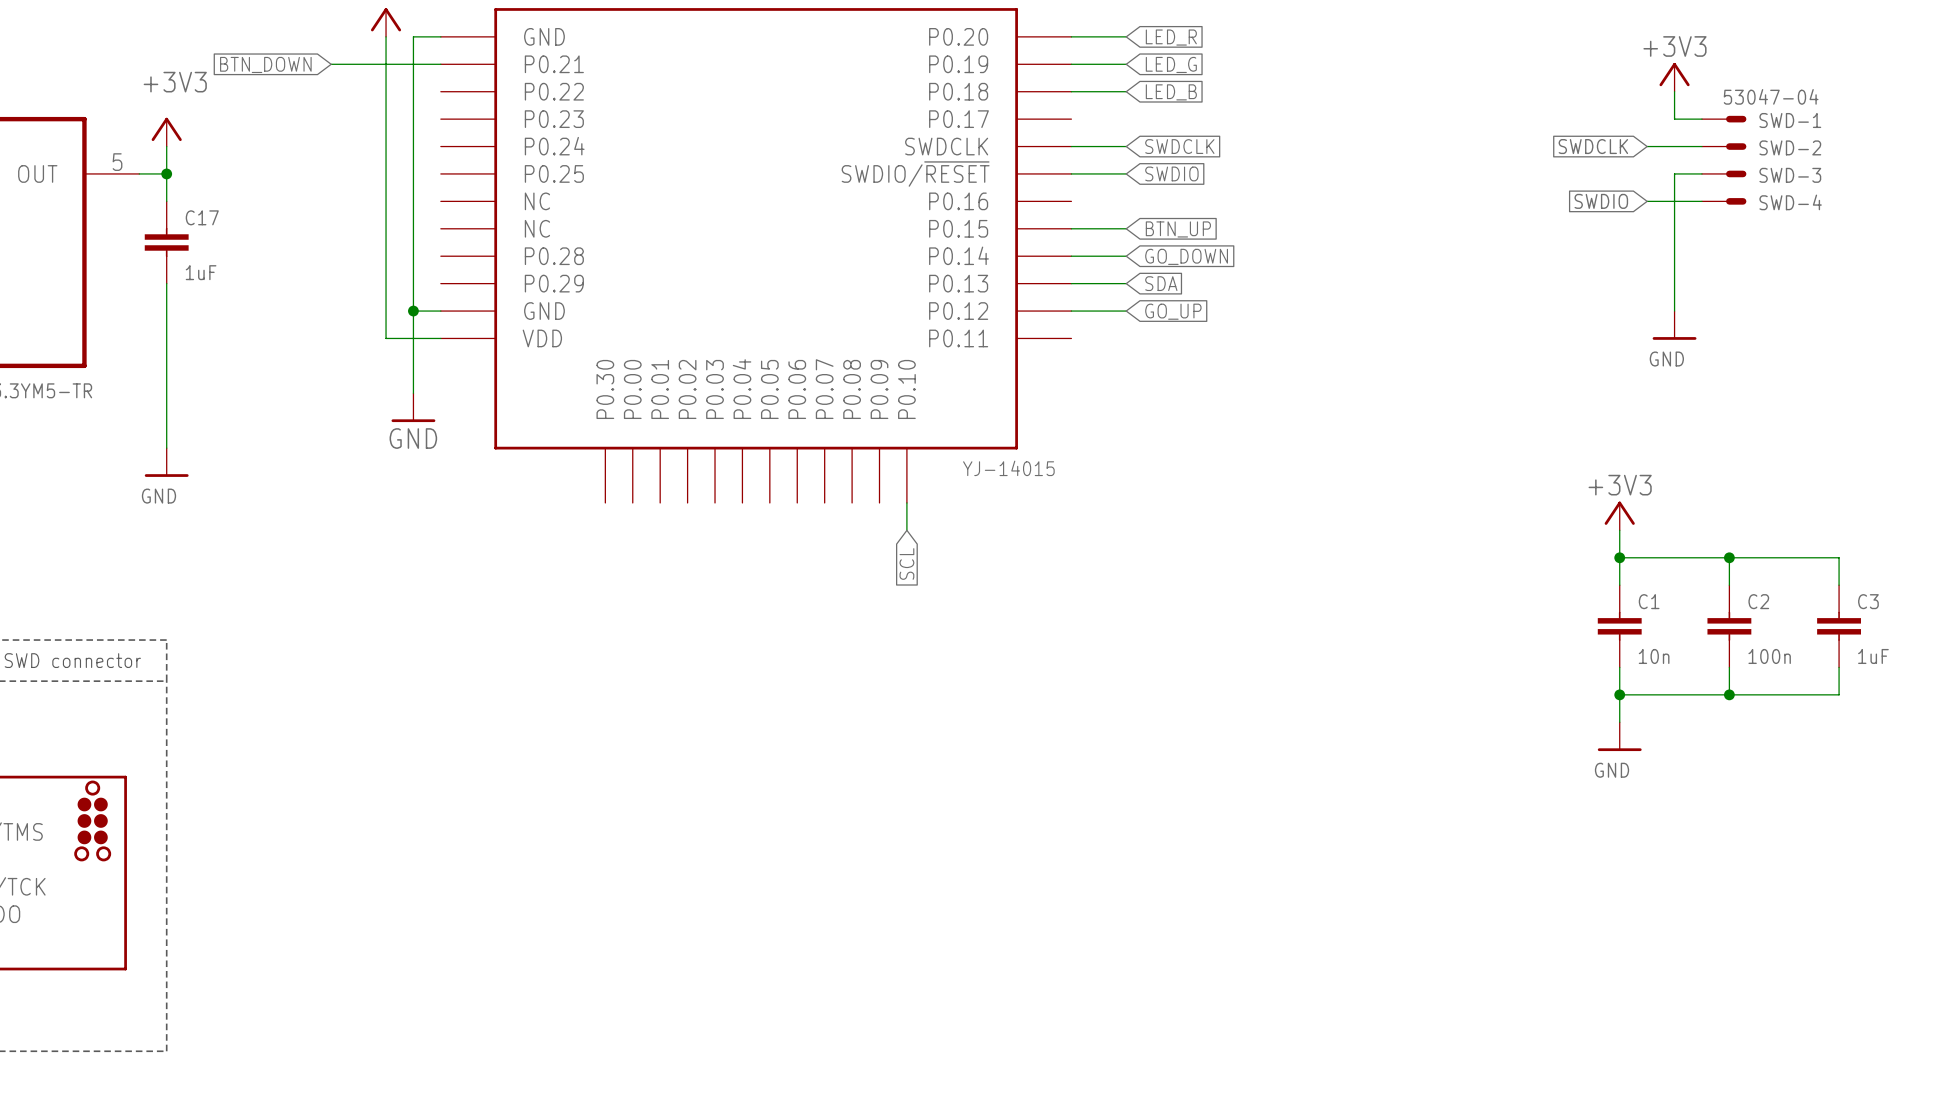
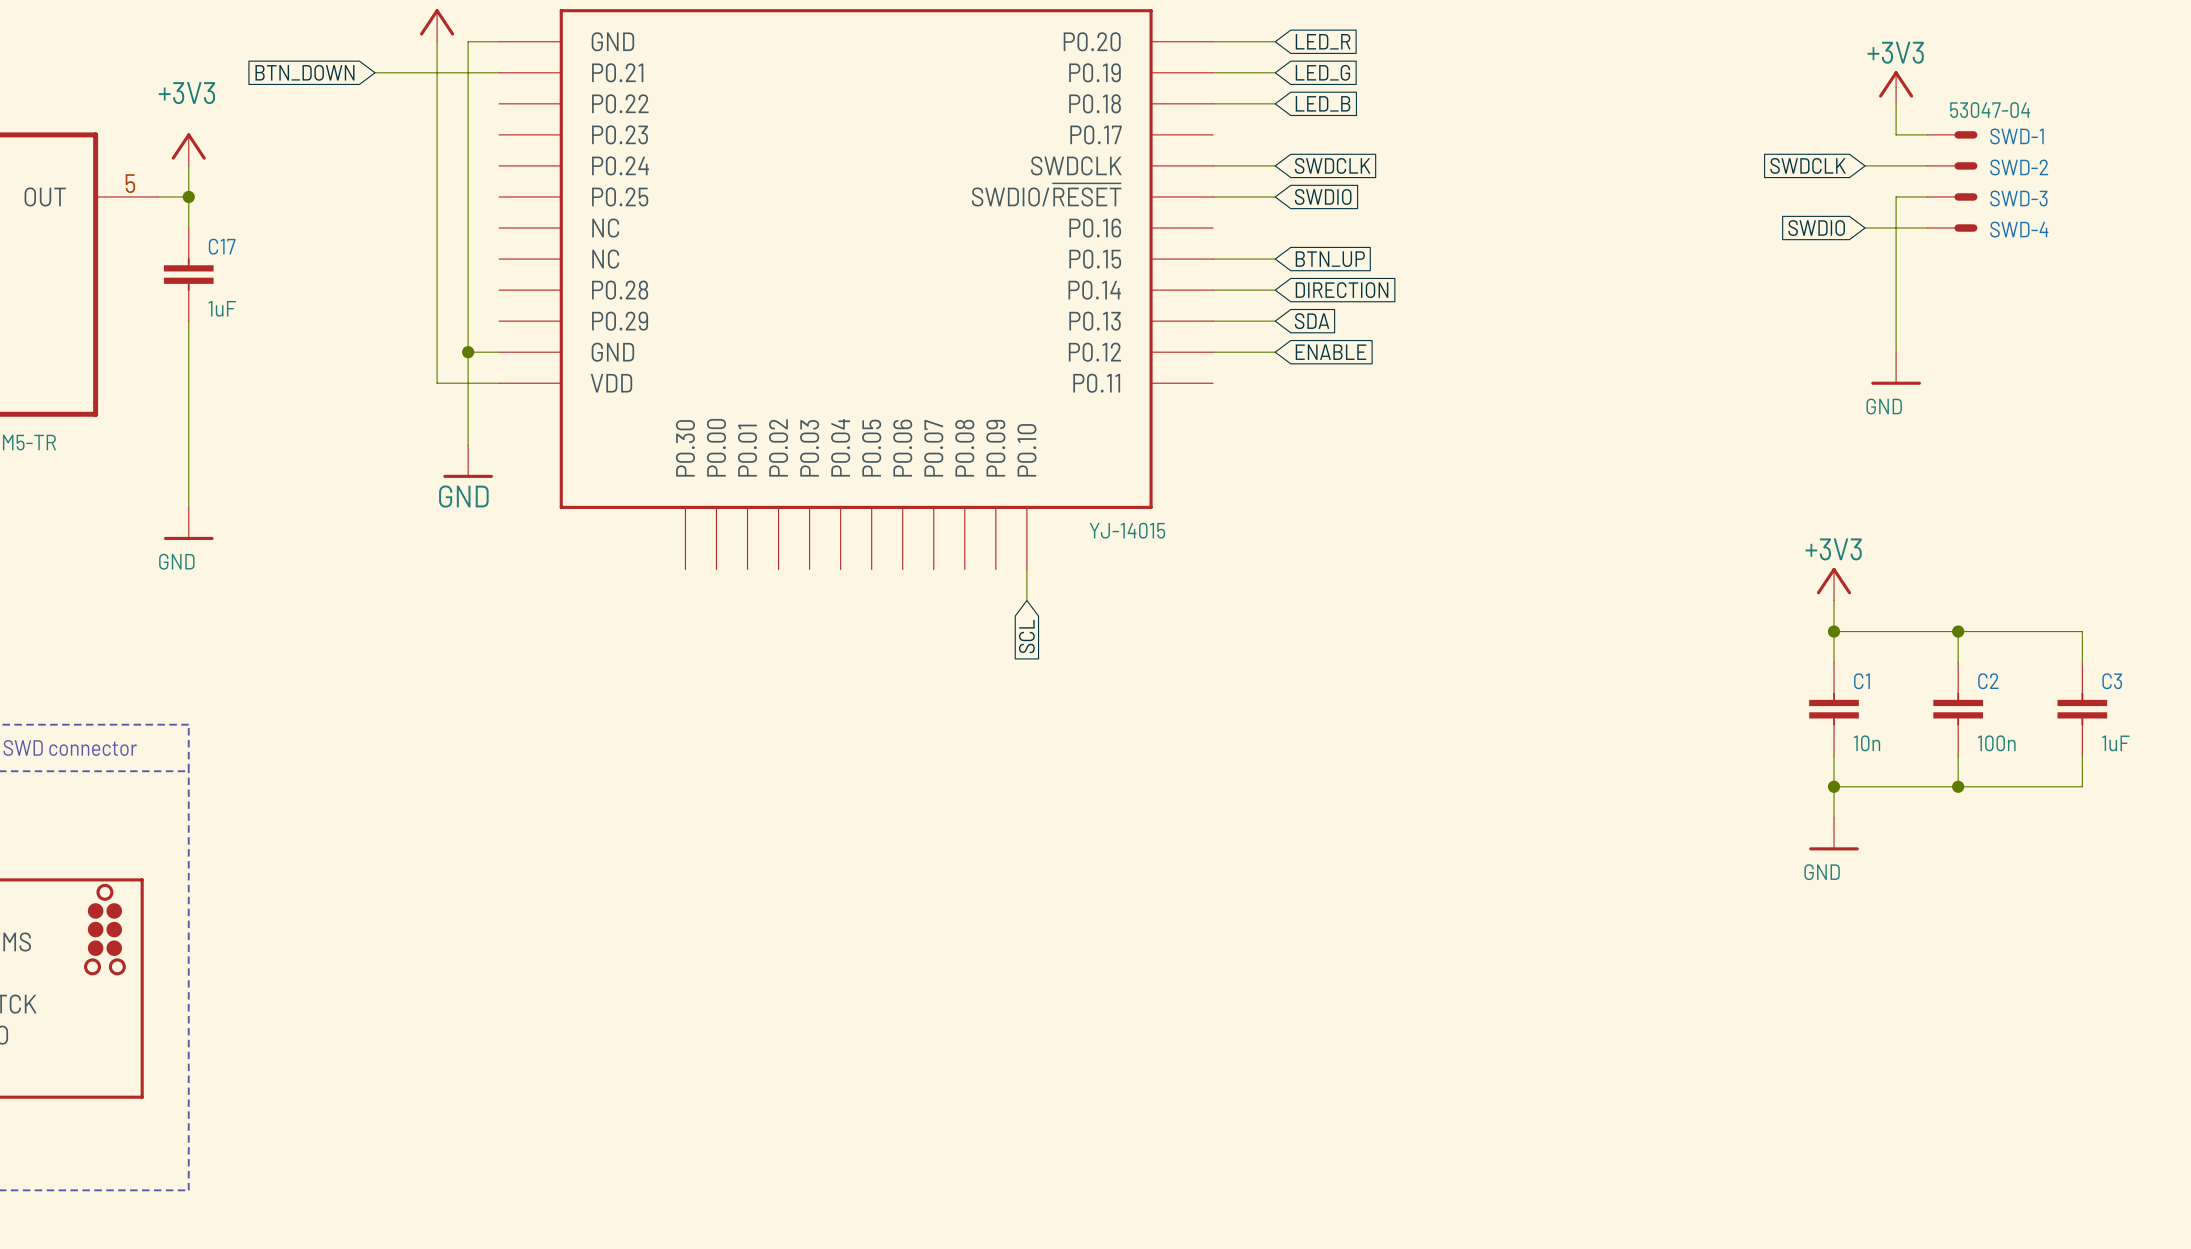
global label: GO_DOWN (1186, 256) -> DIRECTION (1342, 290)
global label: GO_UP (1173, 311) -> ENABLE (1331, 352)

